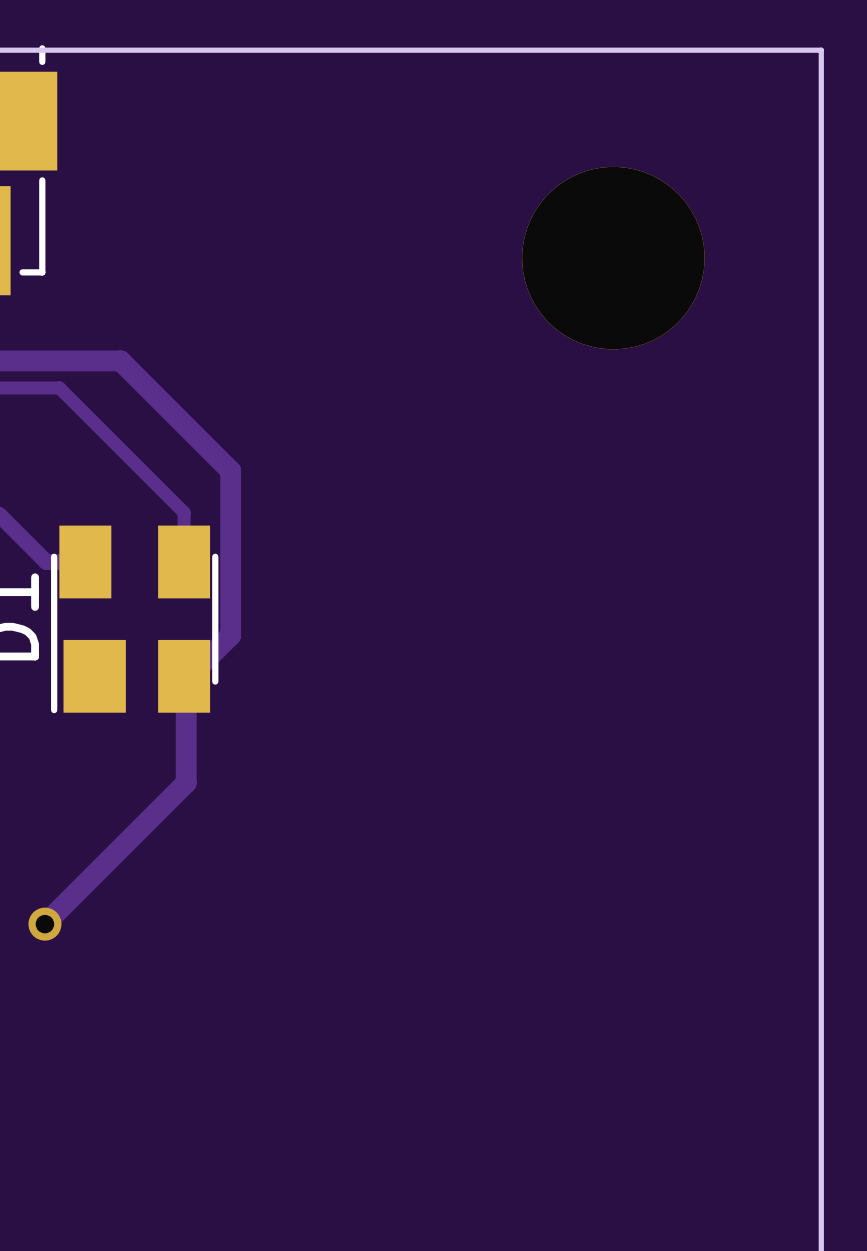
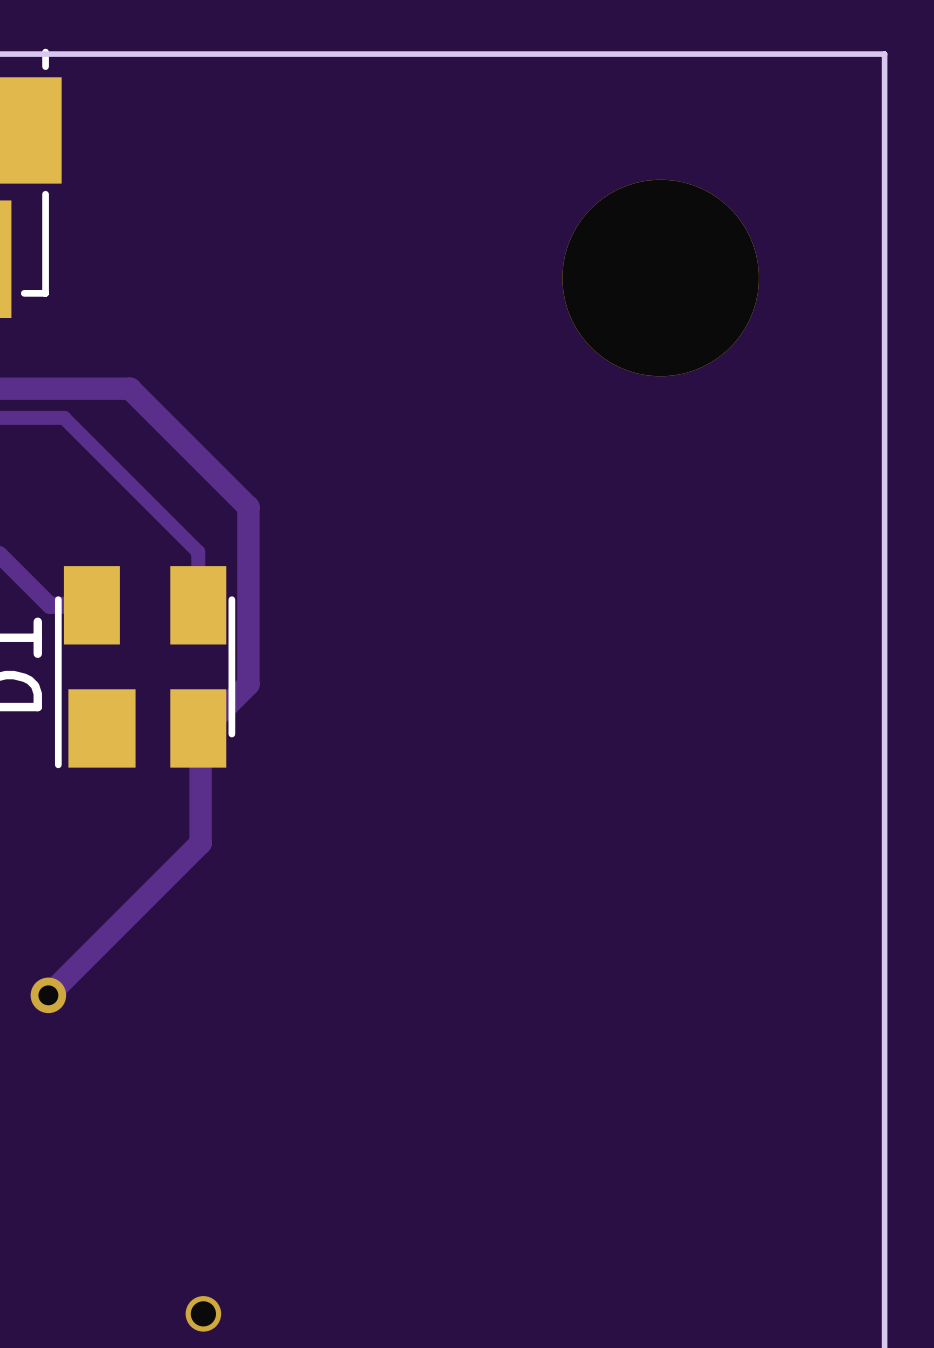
via: none -> (203, 1313)

